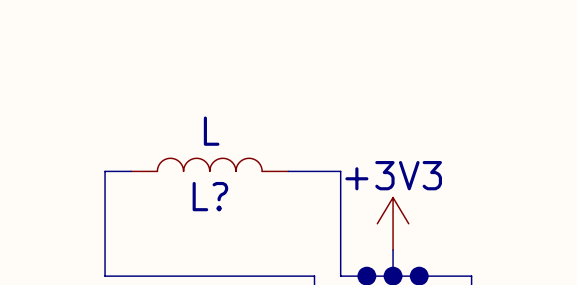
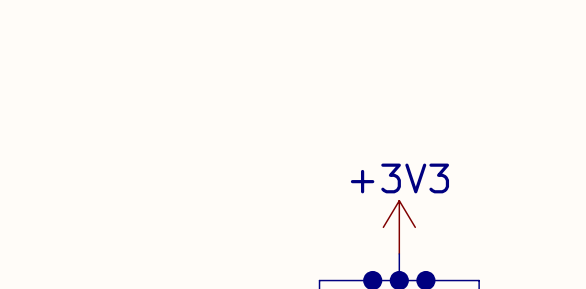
L?: L (209, 164) -> none
wire: (131, 171) (105, 171) (105, 276) (314, 276) -> none
wire: (288, 171) (340, 171) (340, 276) -> (319, 280) (346, 280)

